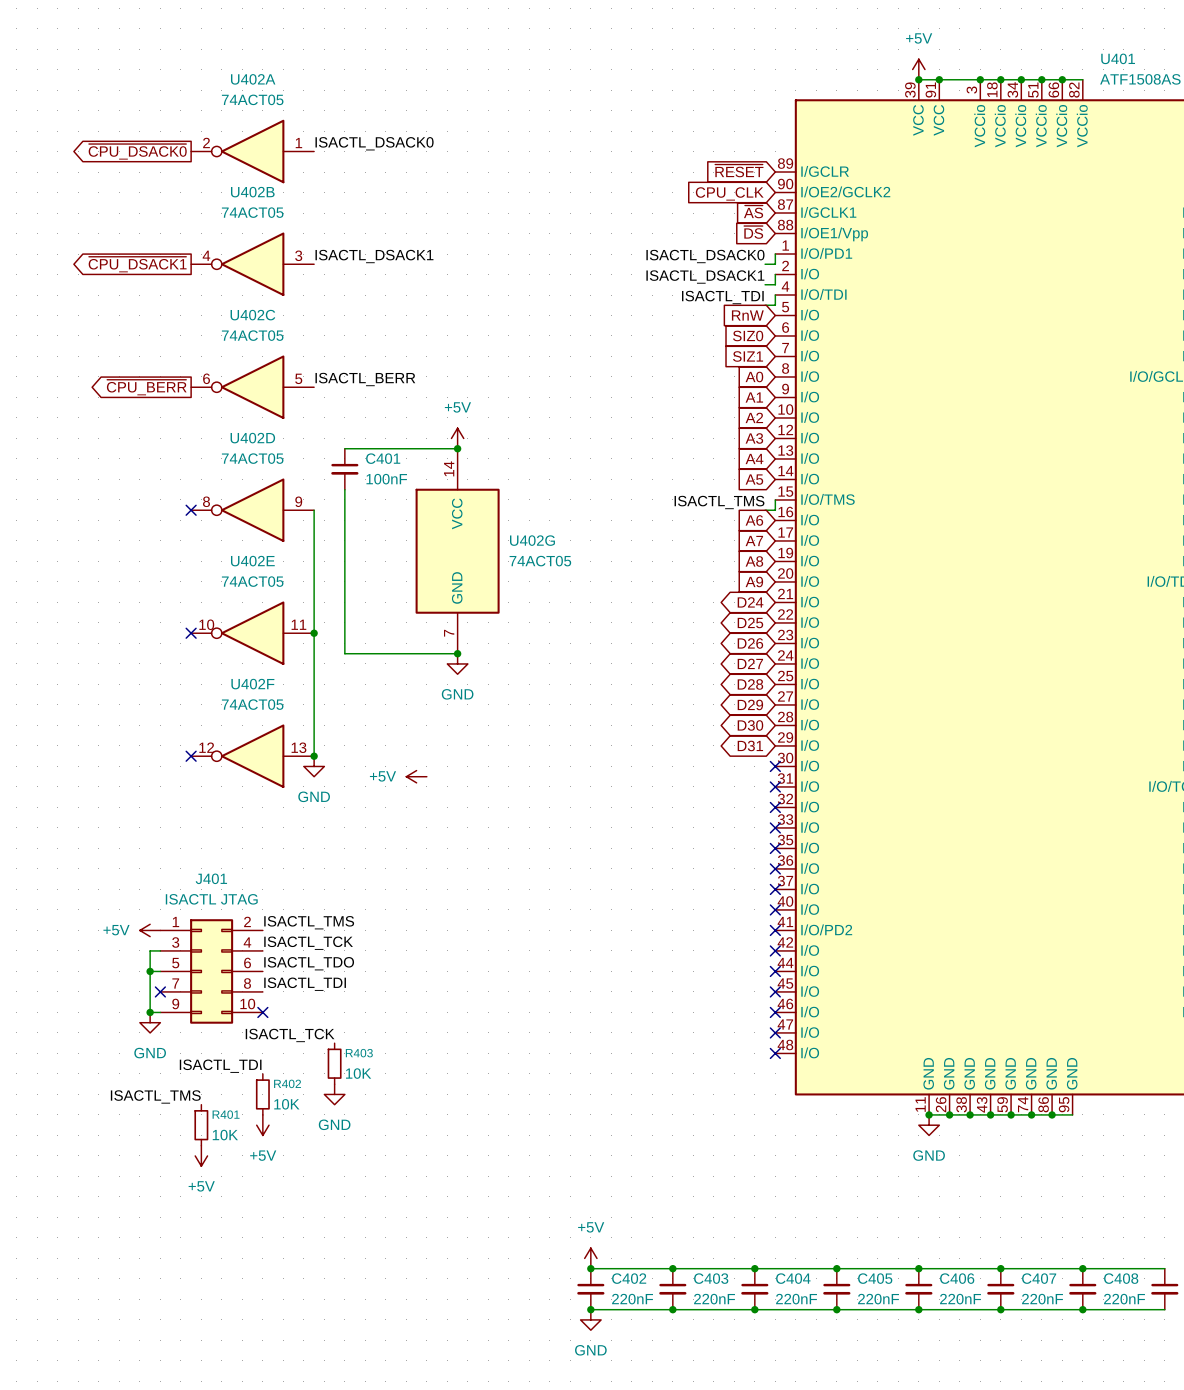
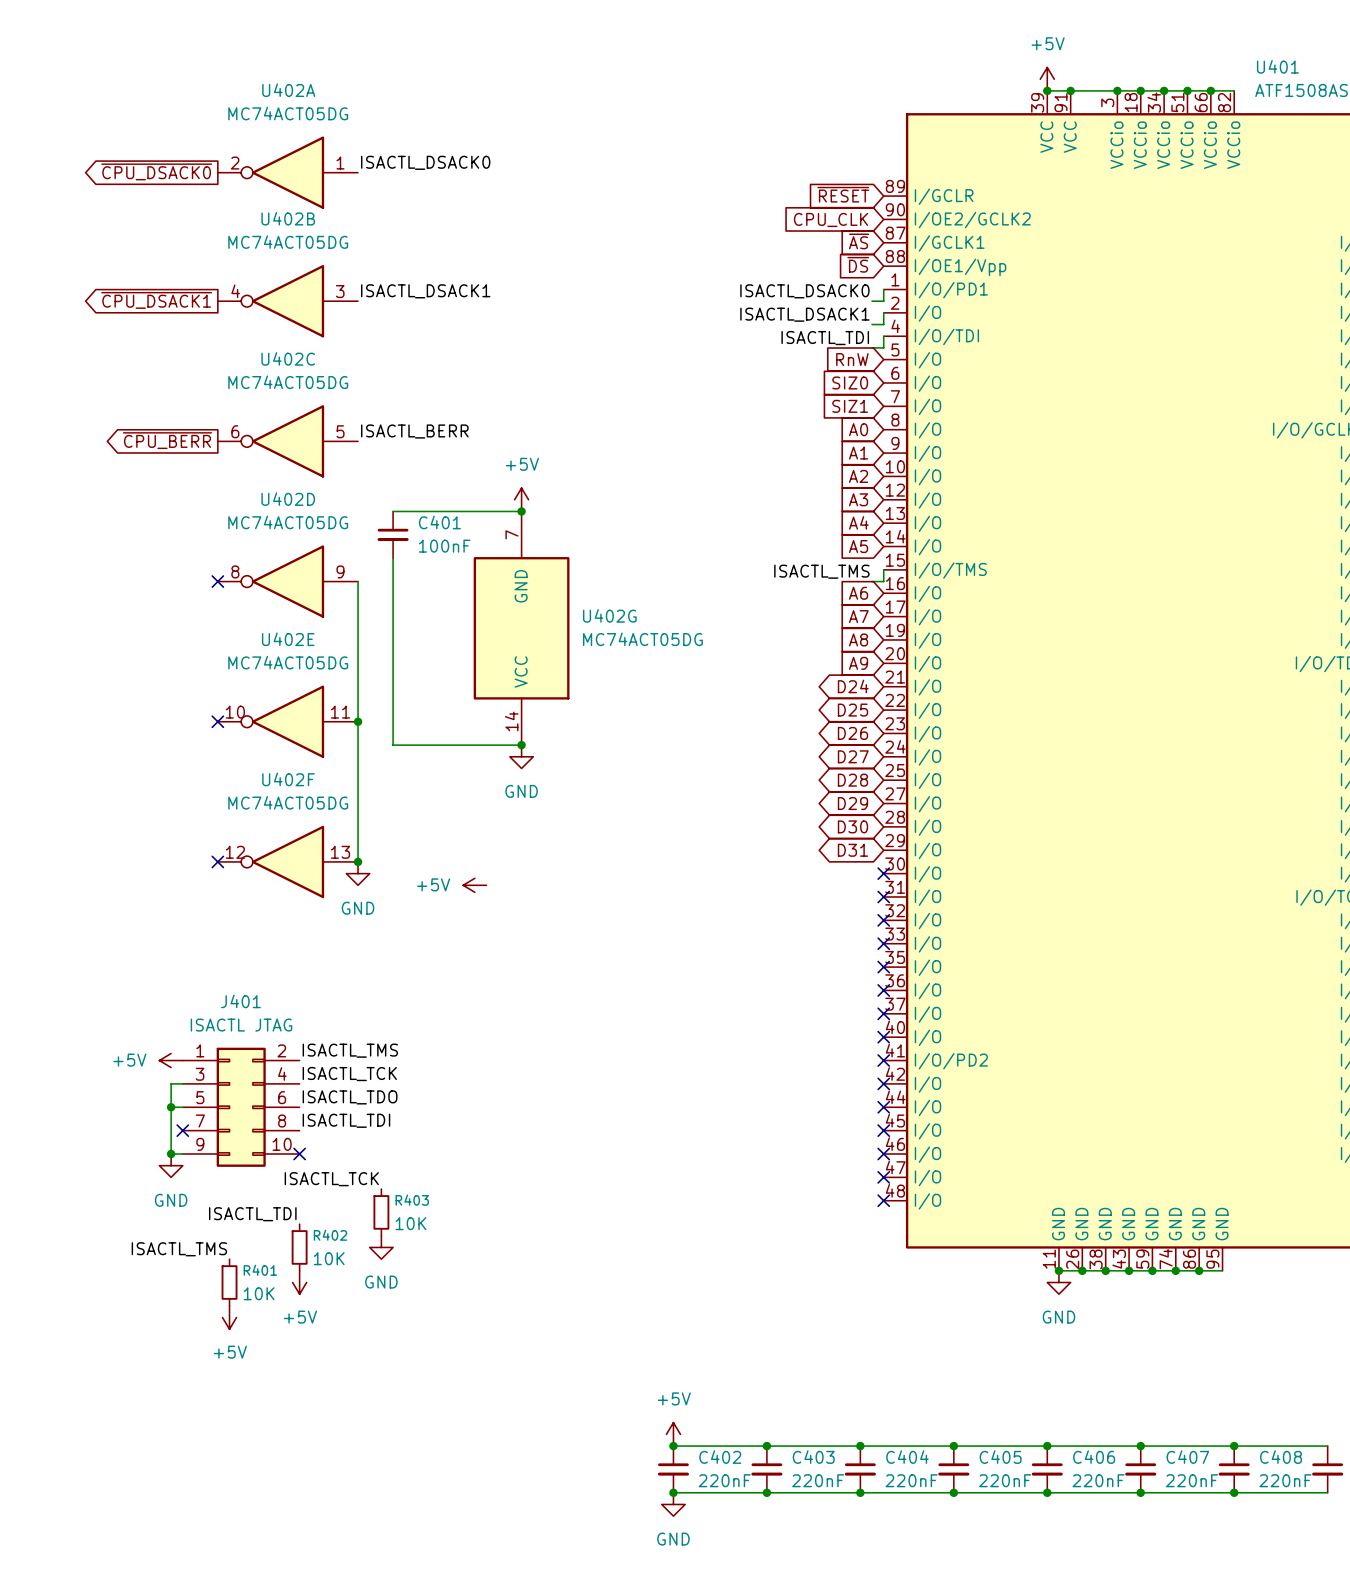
U402A value: 74ACT05 (252, 99) -> MC74ACT05DG (288, 113)
U402B value: 74ACT05 (252, 212) -> MC74ACT05DG (288, 242)
U402C value: 74ACT05 (252, 335) -> MC74ACT05DG (288, 382)
U402D value: 74ACT05 (252, 458) -> MC74ACT05DG (288, 522)
U402G rotation: 0° (457, 551) -> 180° (521, 628)
U402G value: 74ACT05 (540, 561) -> MC74ACT05DG (642, 639)
U402E value: 74ACT05 (252, 581) -> MC74ACT05DG (288, 662)
U402F value: 74ACT05 (252, 704) -> MC74ACT05DG (288, 802)

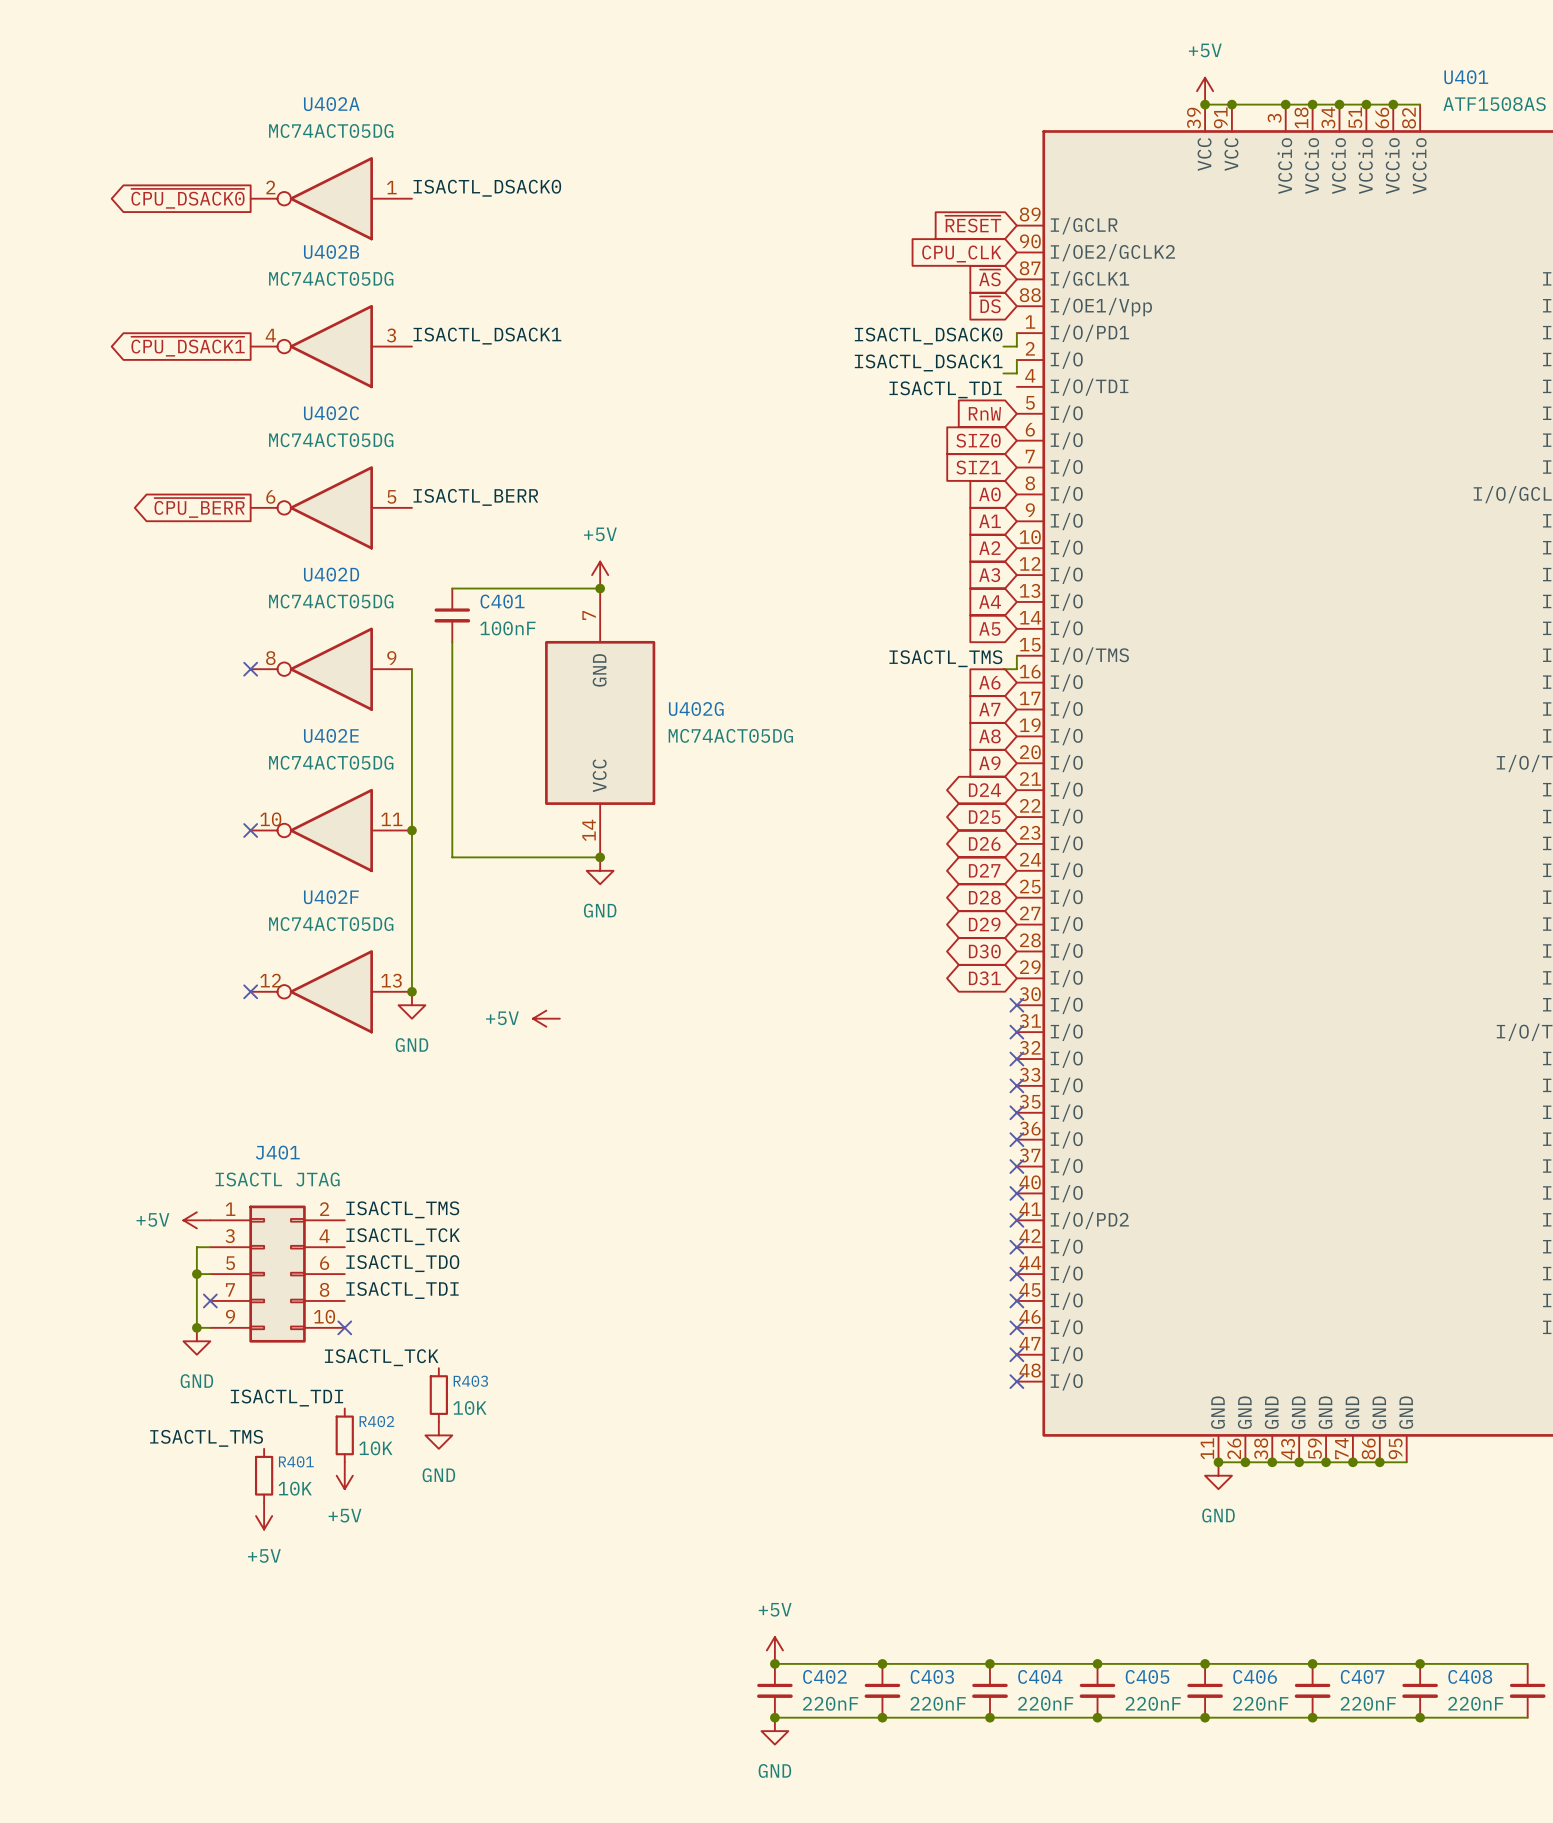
wire: (883, 336) (883, 347) (872, 347) -> none

